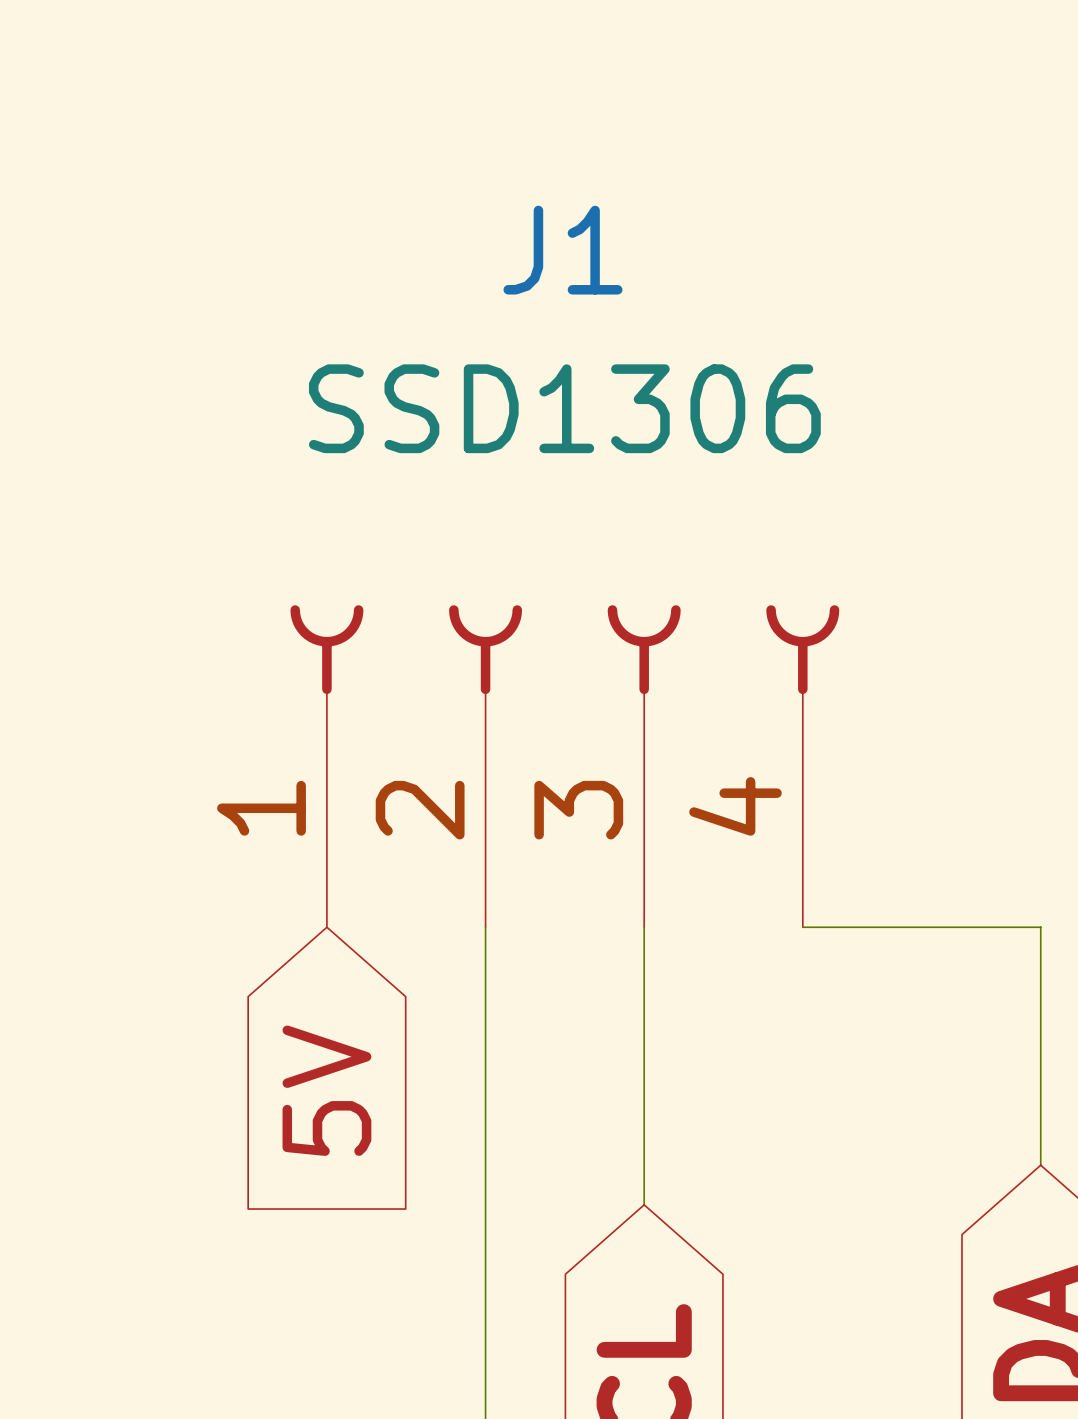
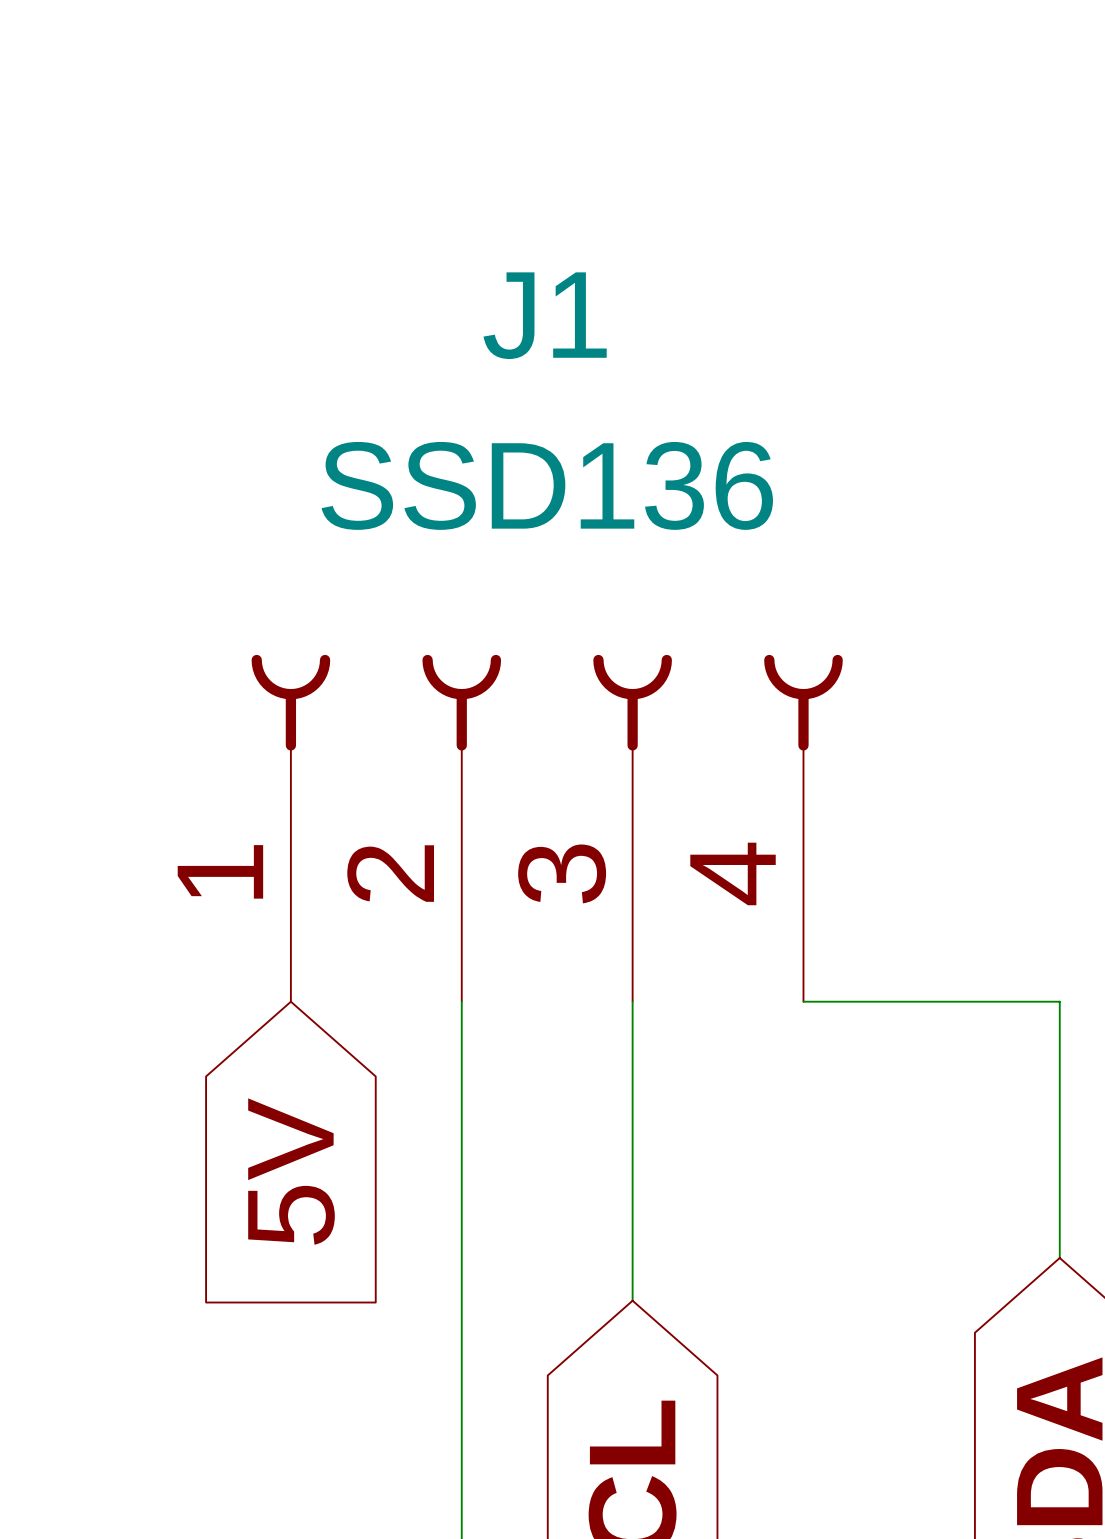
J1 name position: J1 (562, 250) -> J1 (545, 315)
J1 value: SSD1306 (564, 408) -> SSD136 (547, 485)

